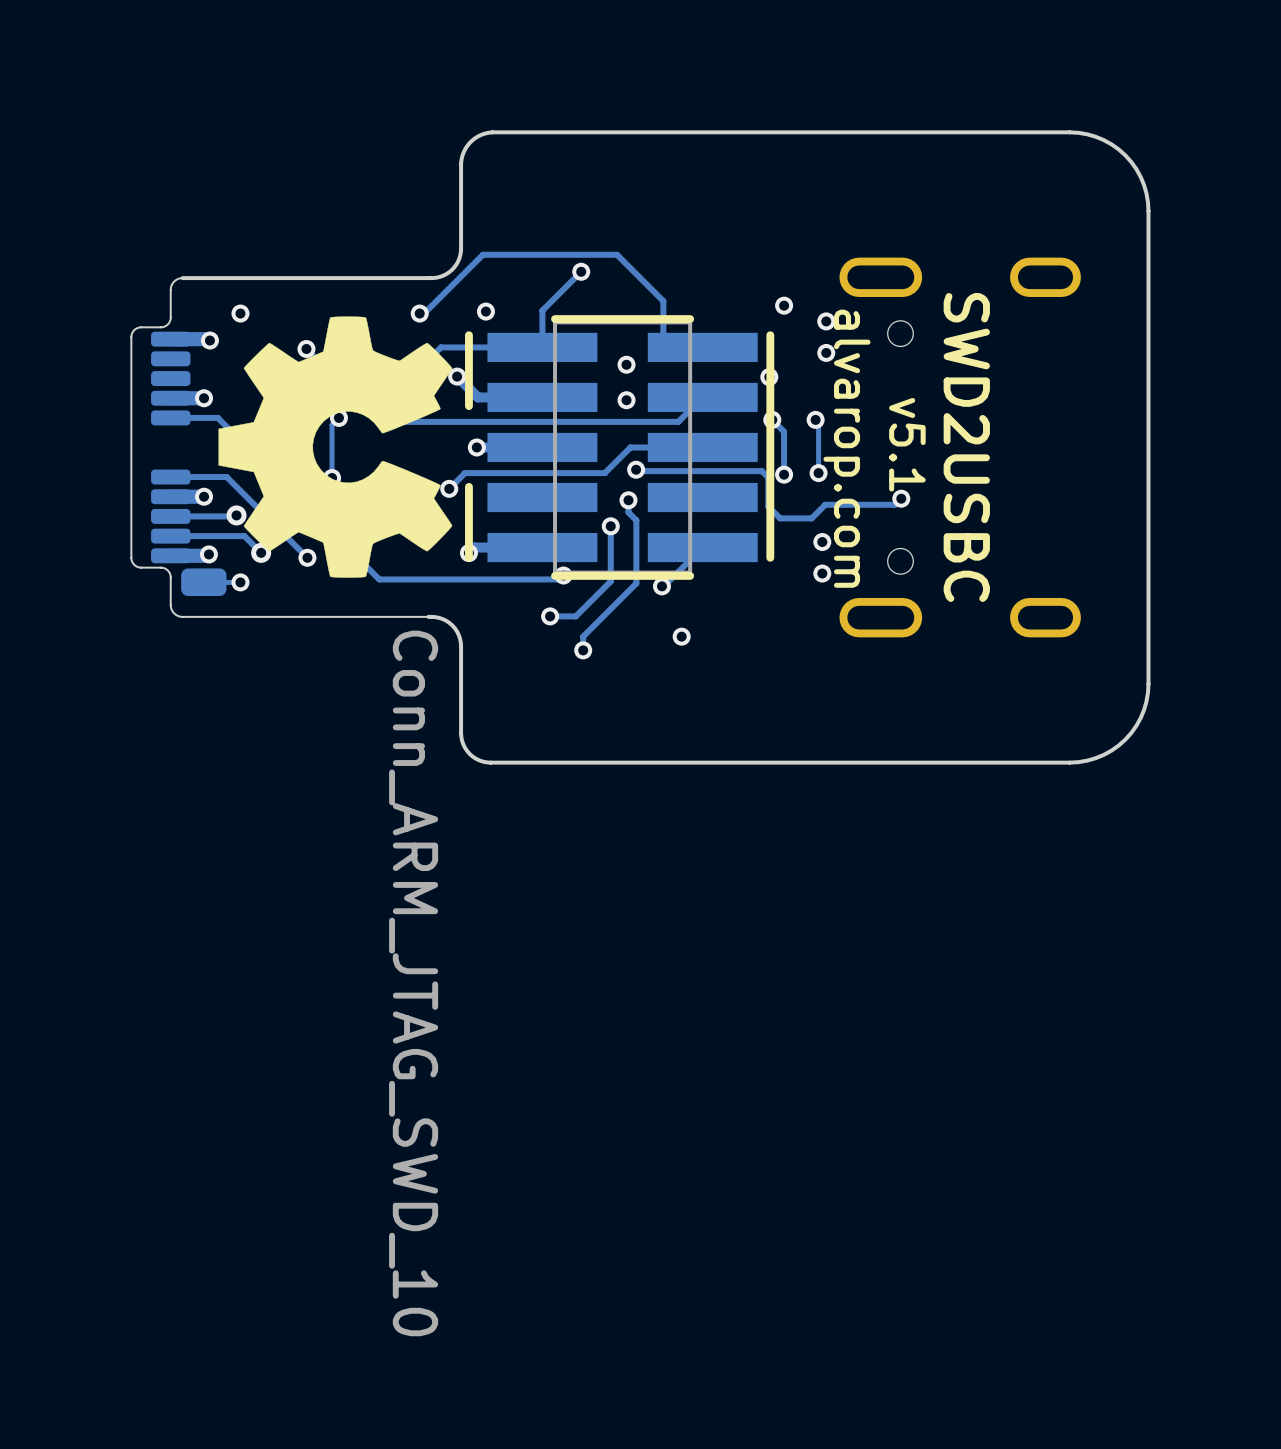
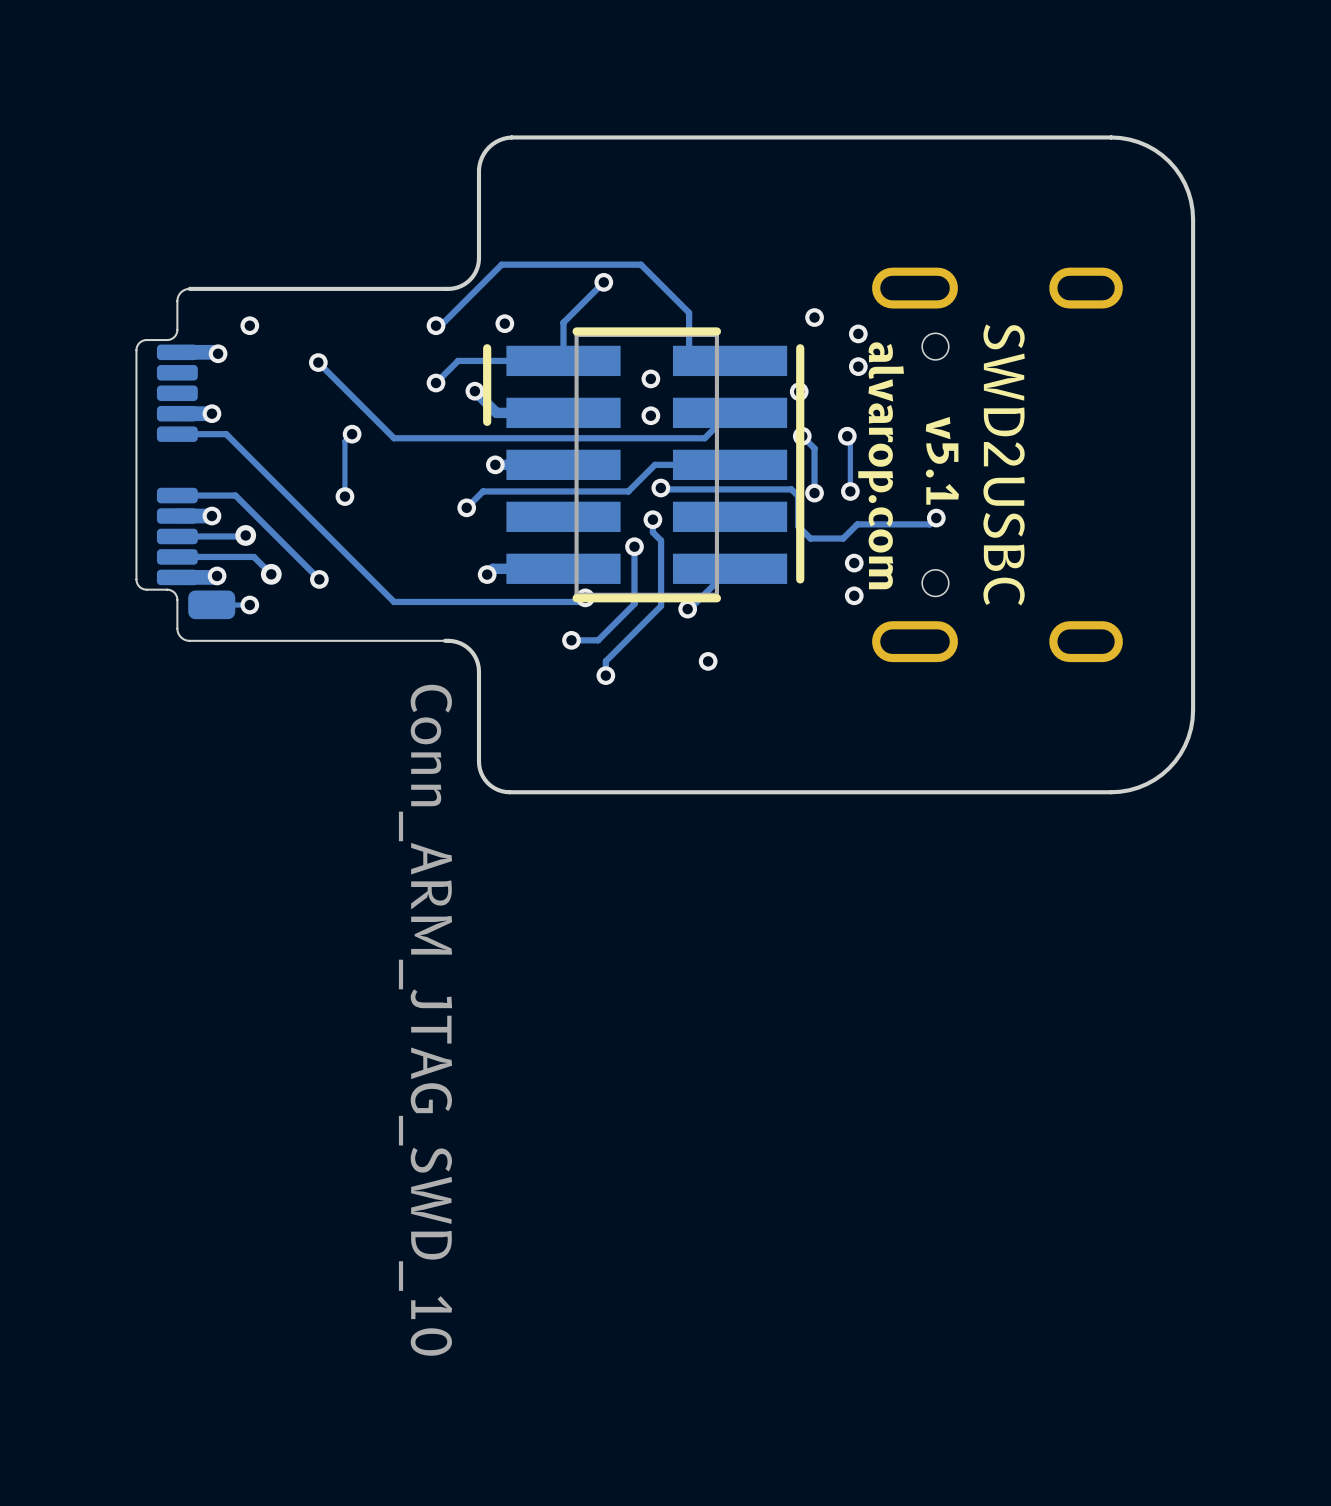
drawing: [218, 316, 453, 578] -> none
line: (468, 486) (468, 557) -> none

